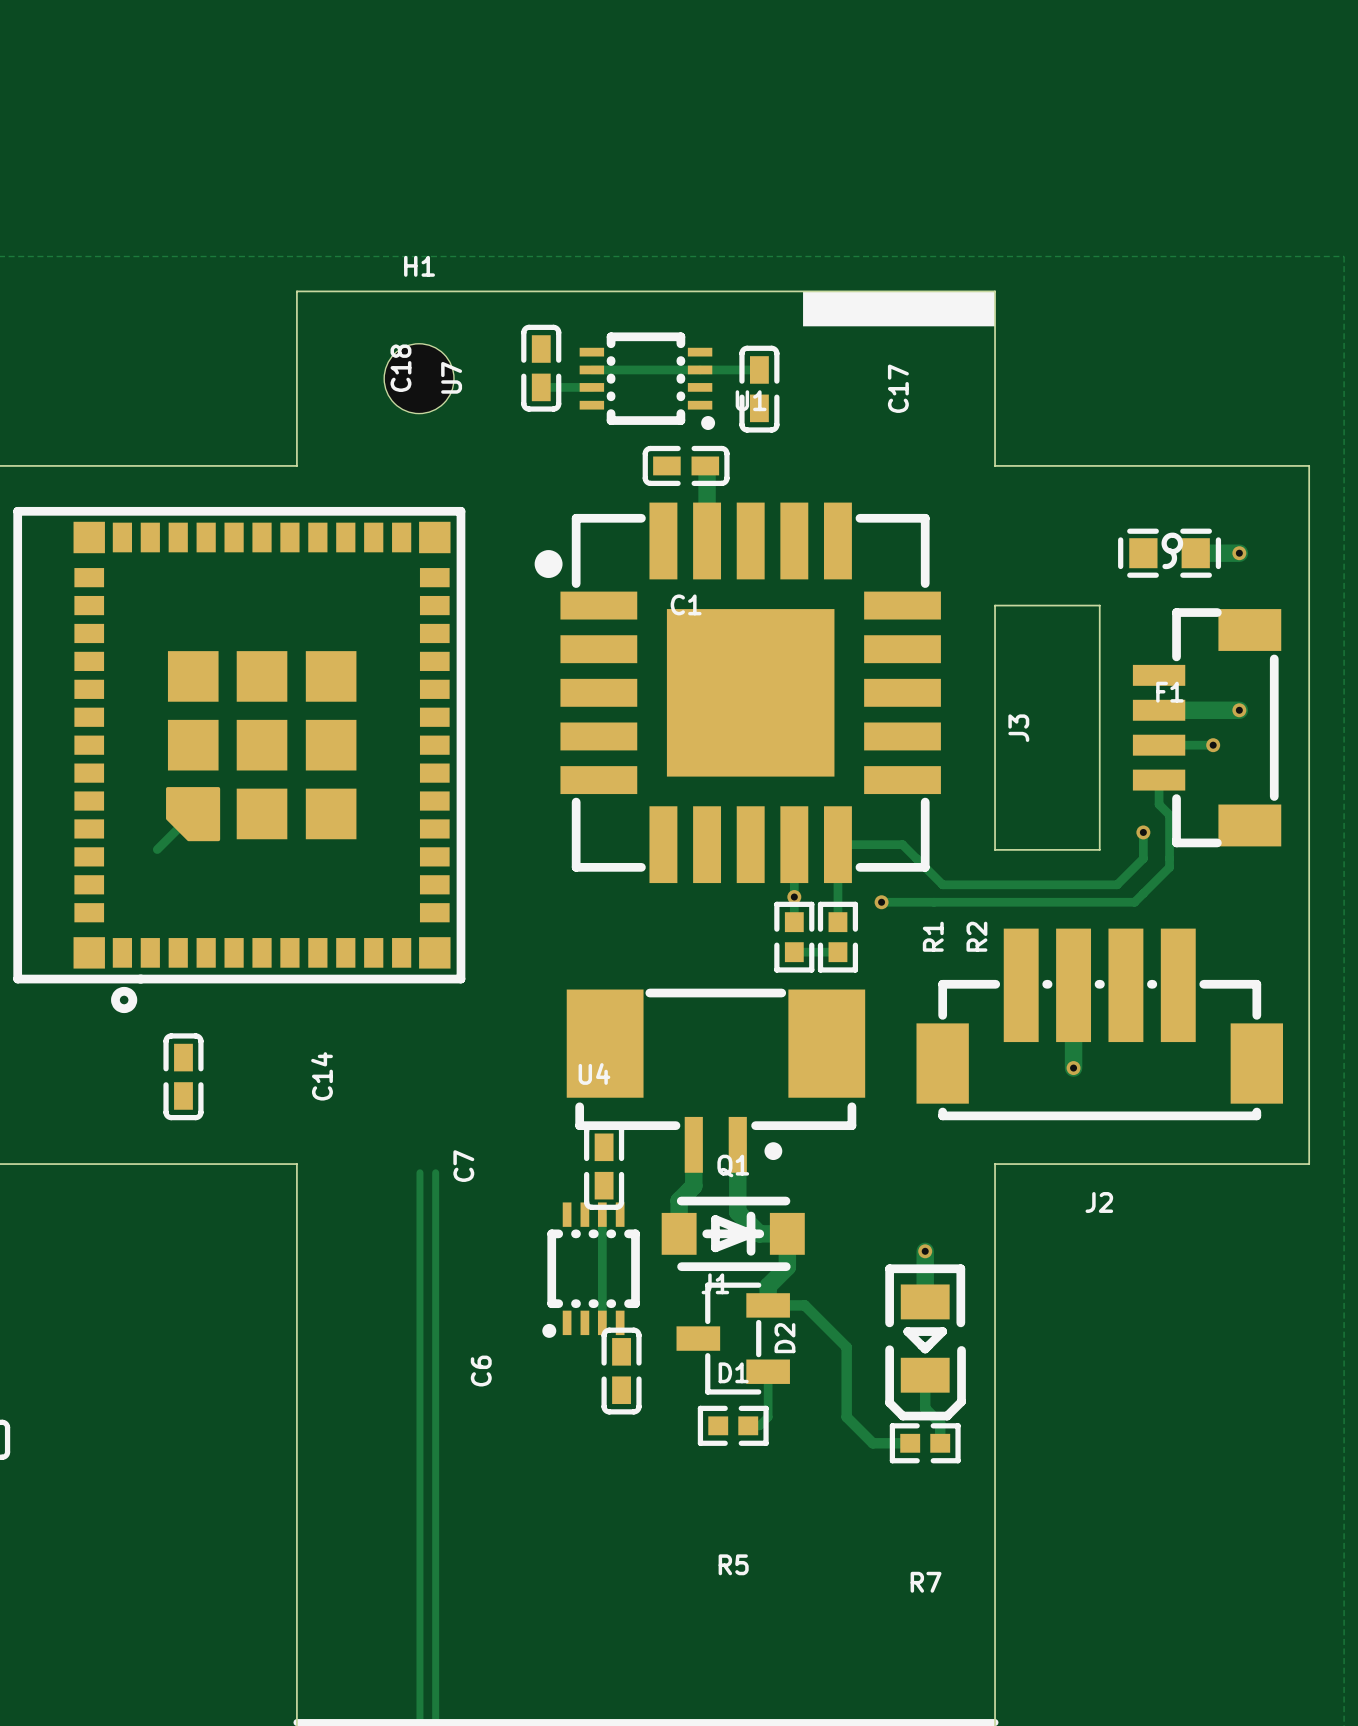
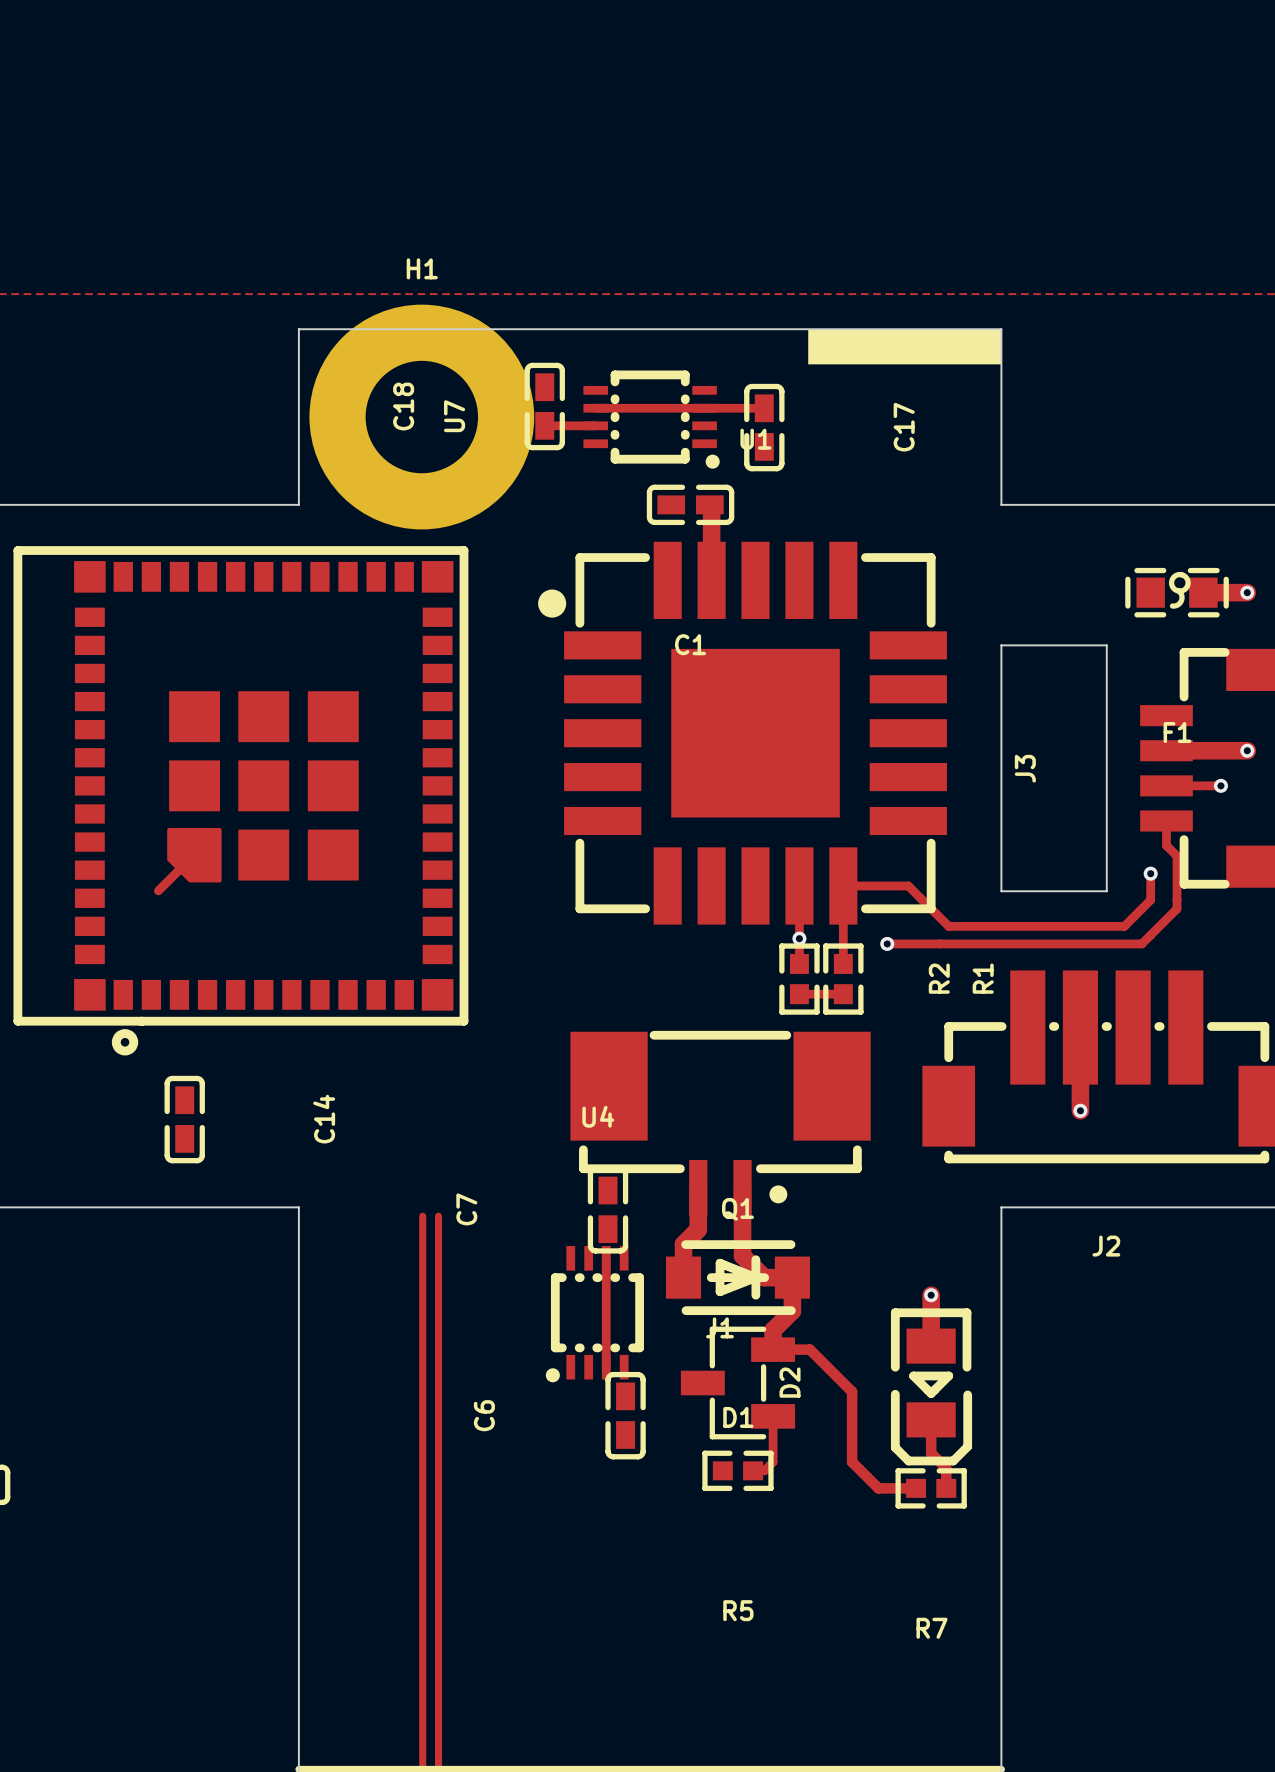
H1 footprint: [384, 343, 454, 414] -> [309, 304, 535, 530]
R1 name: R1 (933, 936) -> R2 (939, 978)
R2 name: R2 (976, 936) -> R1 (983, 978)

